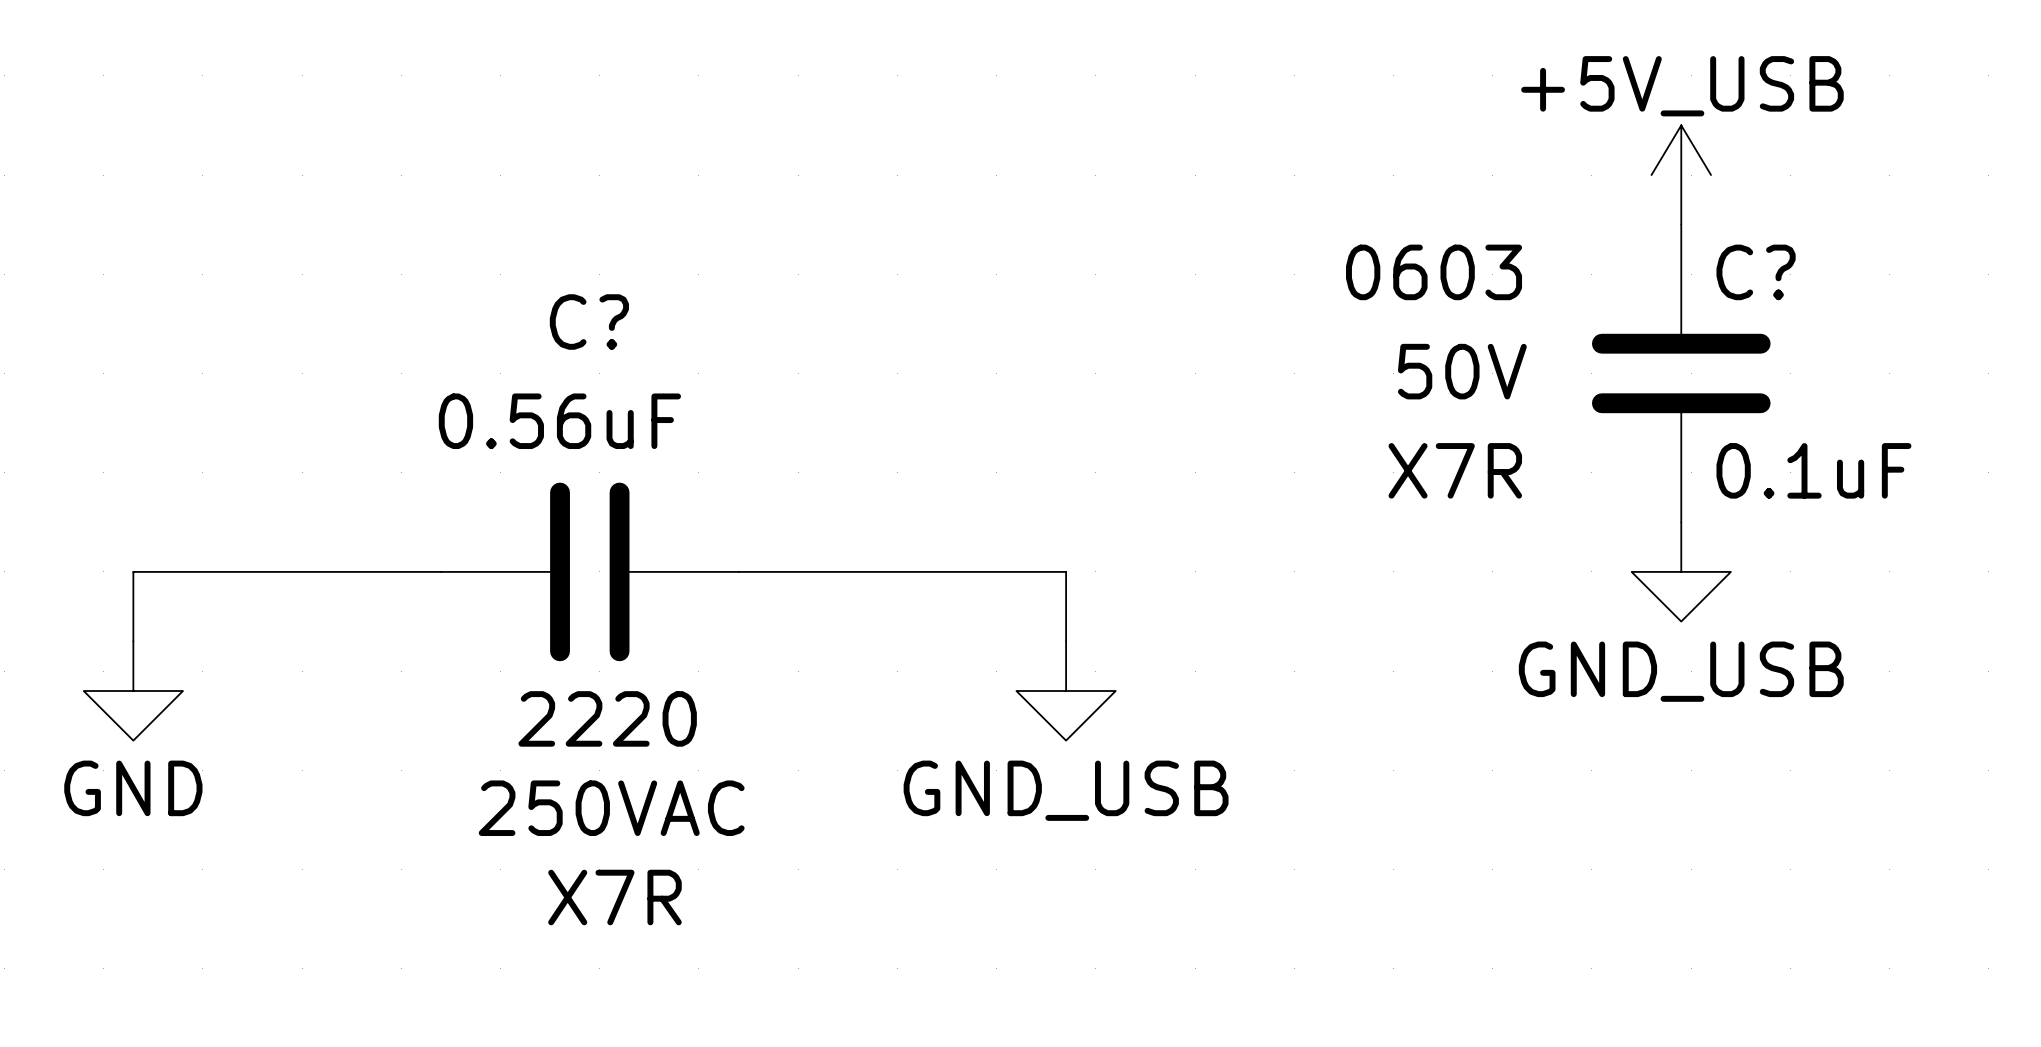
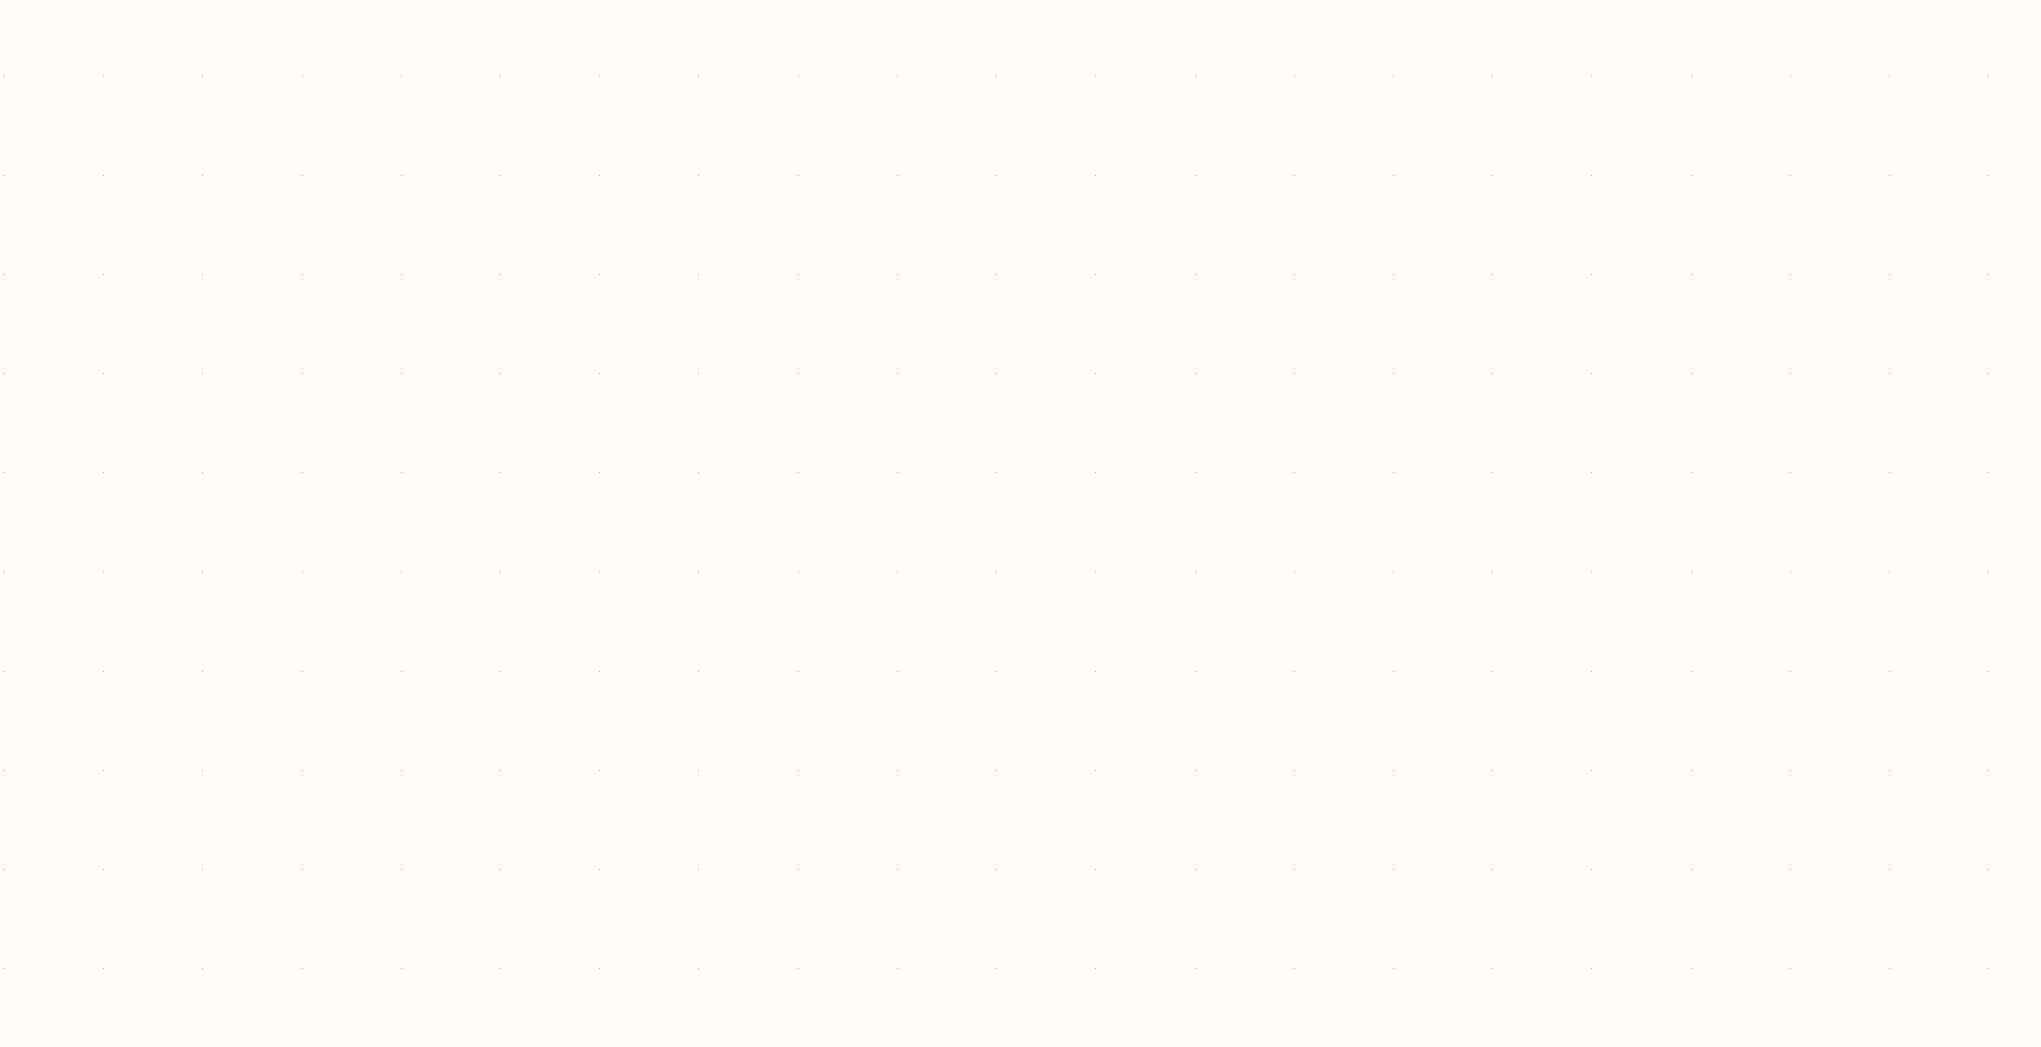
power symbol: +5V_USB (1681, 175) -> none
C?: 0.1uF (1681, 373) -> none
wire: (440, 571) (133, 571) (133, 641) -> none
C?: 0.56uF (589, 571) -> none
wire: (738, 571) (1066, 571) (1066, 641) -> none
power symbol: GND_USB (1681, 571) -> none
power symbol: GND (133, 691) -> none
power symbol: GND_USB (1066, 691) -> none

